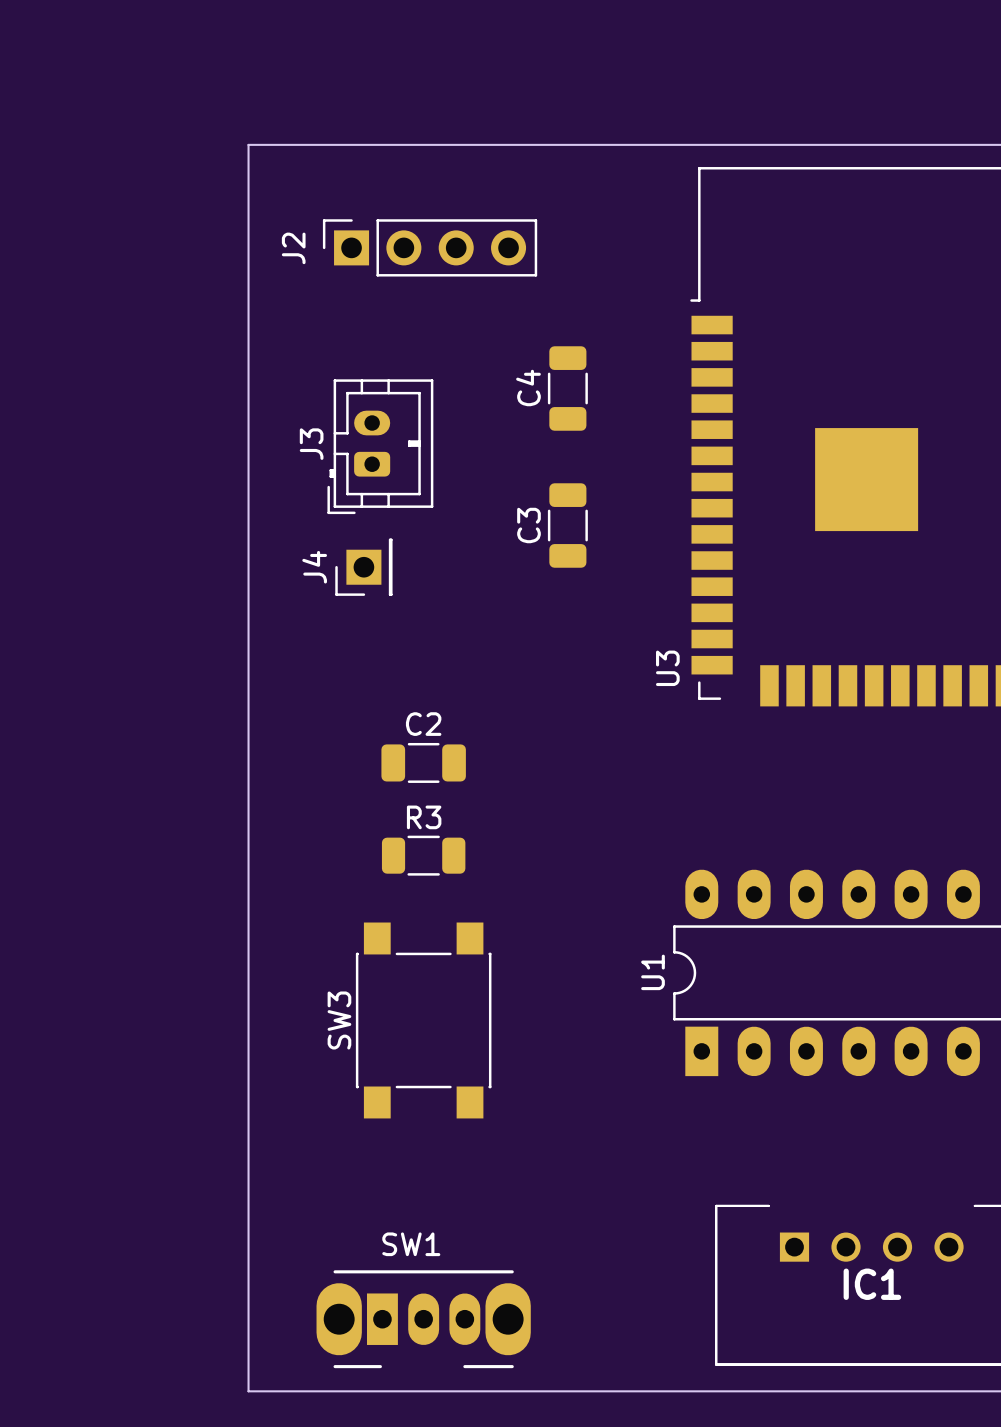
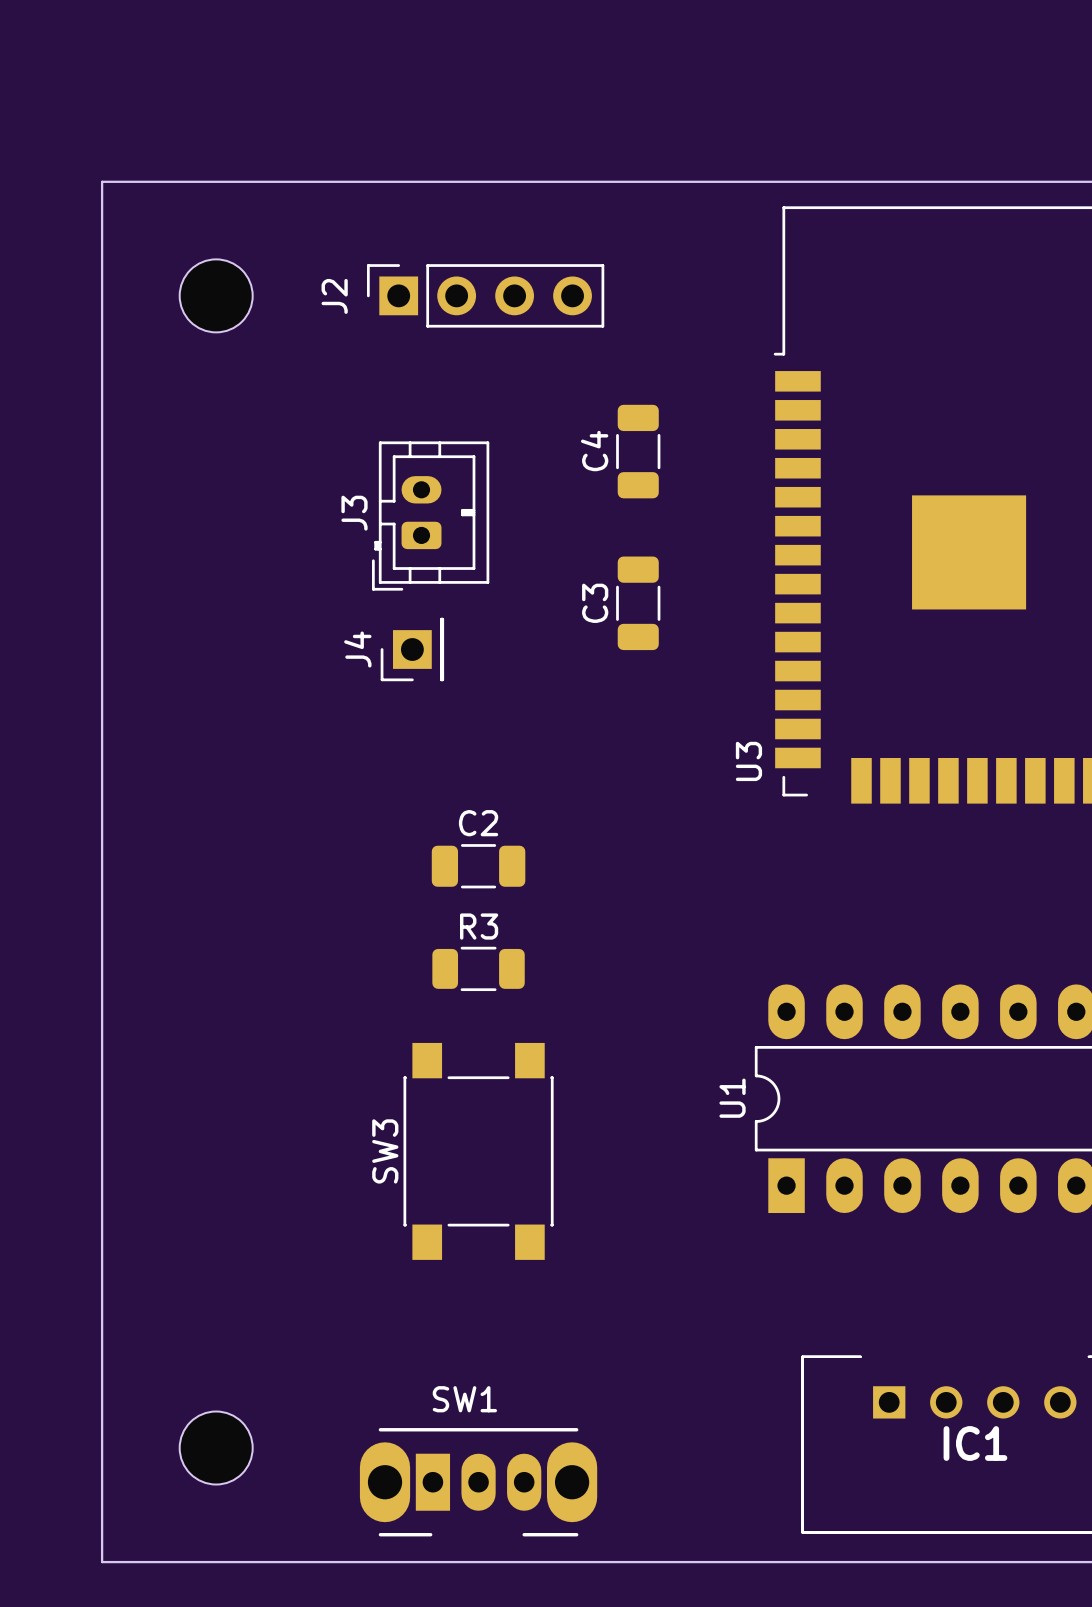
board edge: (248, 144) (248, 1391) -> (284, 181) (102, 181) (102, 1562) (284, 1562)
part: none -> (216, 295)
part: none -> (216, 1448)

